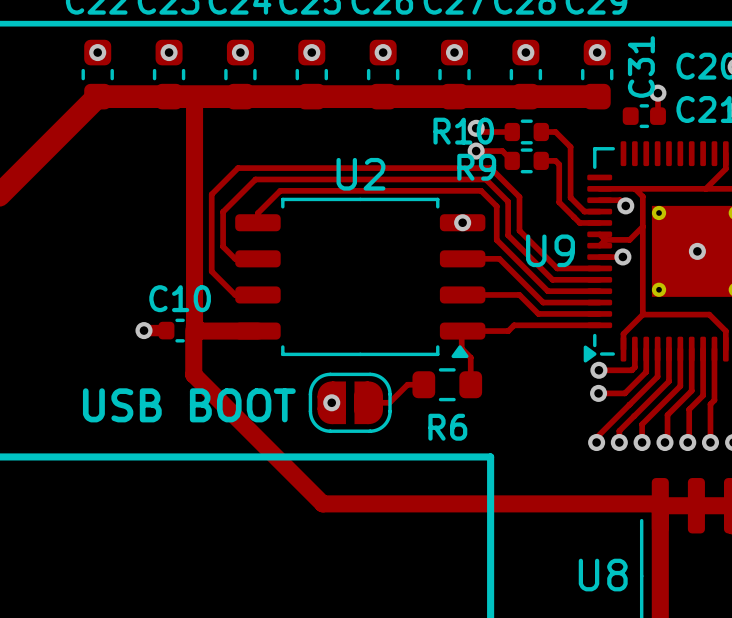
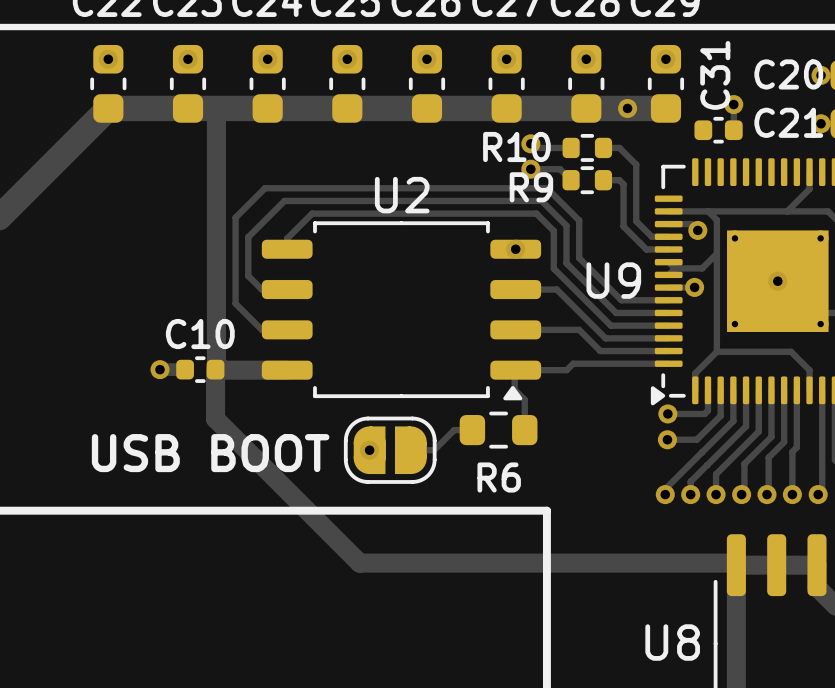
via: none -> (627, 108)

